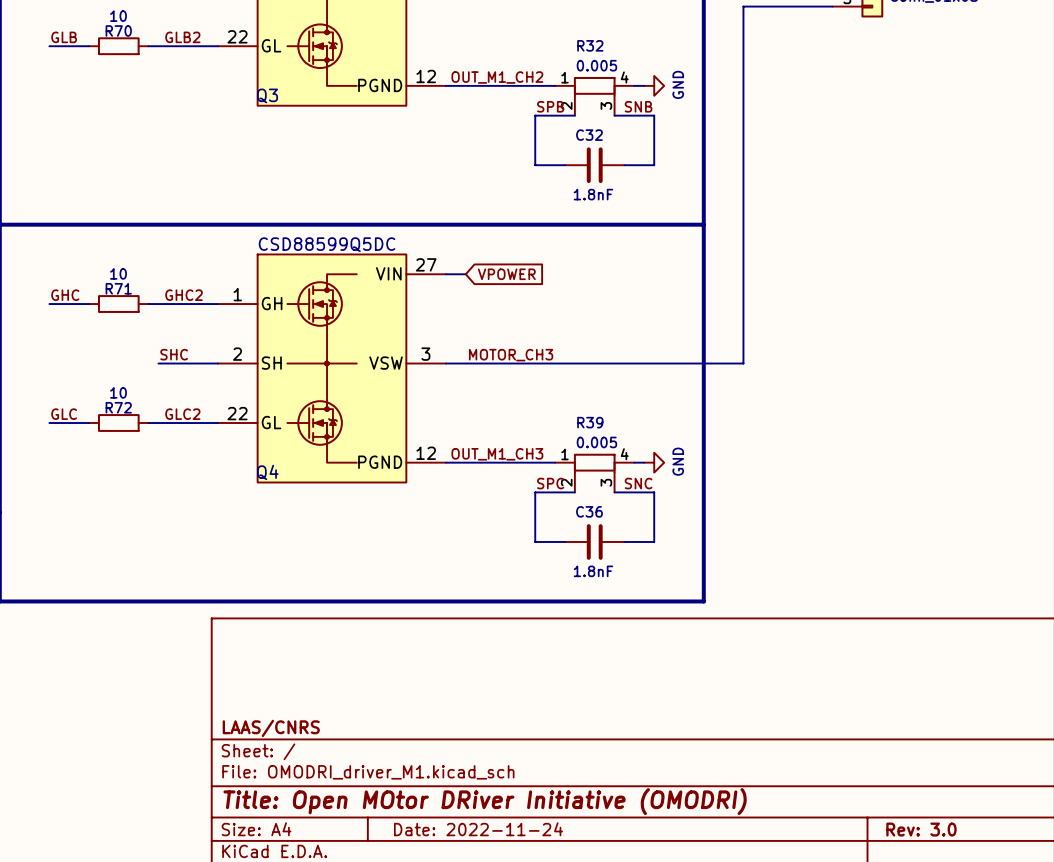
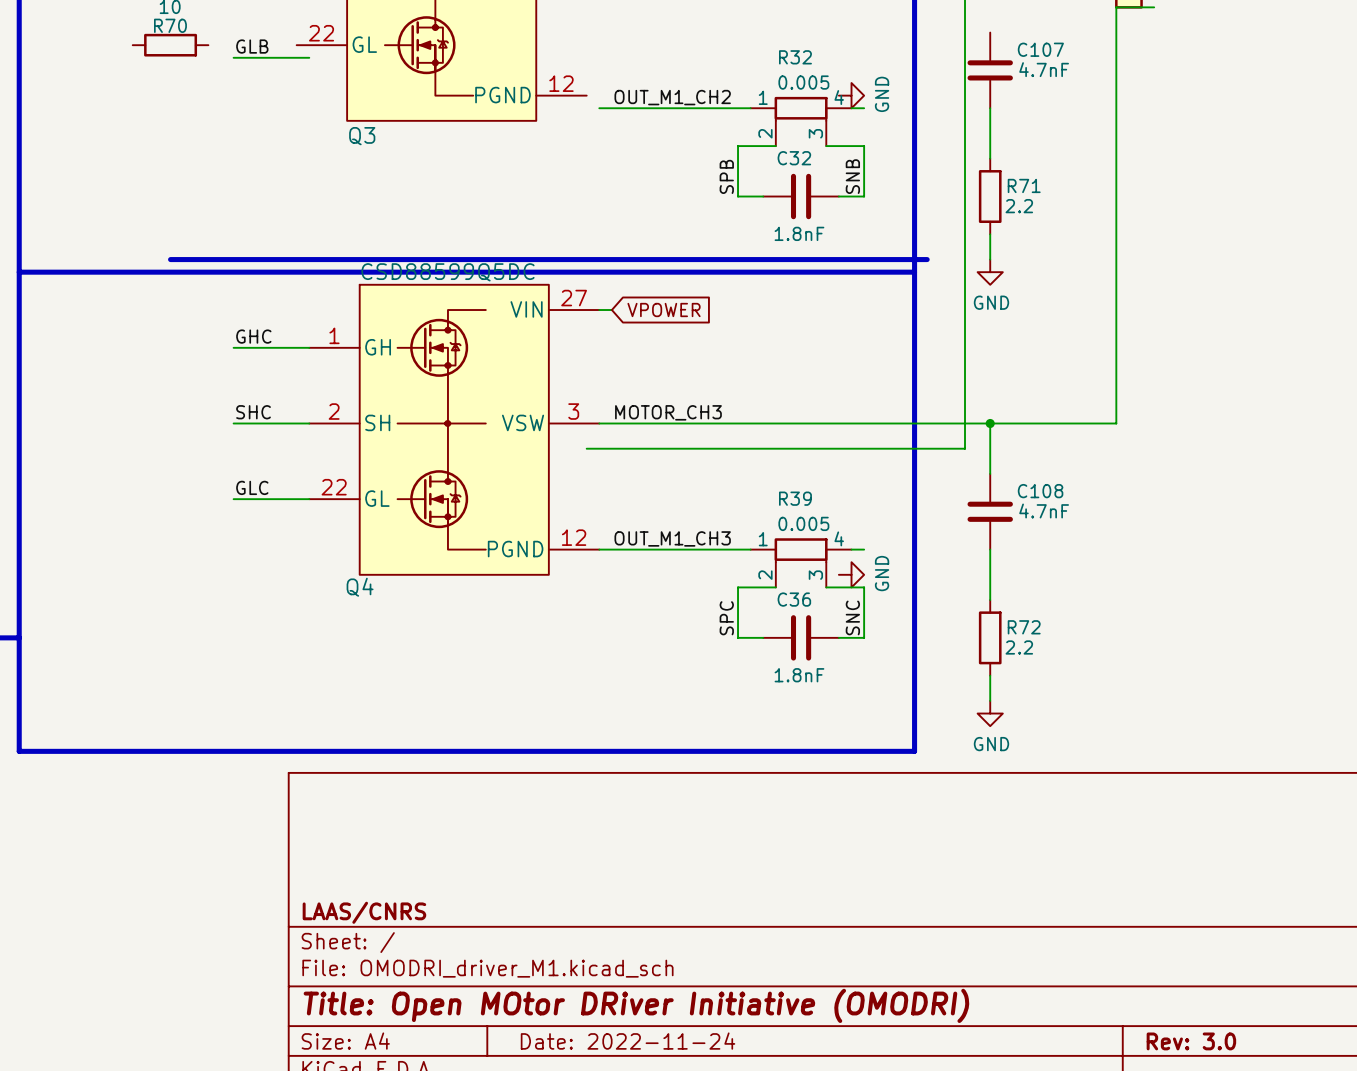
wire: none -> (1154, 7) (1116, 7) (1116, 423) (599, 423)
label: GLB (64, 37) -> none
label: GLB2 (182, 37) -> GLB (252, 46)
wire: (49, 46) (89, 46) -> none
wire: (148, 46) (217, 46) -> none
wire: none -> (233, 57) (309, 57)
C107: none -> 4.7nF (990, 70)
label position: OUT_M1_CH2 (497, 77) -> OUT_M1_CH2 (672, 97)
wire: (446, 85) (555, 85) -> none
wire: (634, 85) (644, 85) -> (851, 108) (864, 108)
Q3 name position: Q3 (267, 95) -> Q3 (362, 136)
wire: none -> (599, 108) (750, 108)
wire: none -> (990, 108) (990, 158)
R32 position: (594, 96) -> (801, 121)
label rotation: 0° (550, 106) -> 90° counterclockwise (726, 176)
label position: SPB (550, 106) -> SPB (726, 176)
label rotation: 0° (638, 106) -> 90° counterclockwise (852, 176)
label position: SNB (638, 106) -> SNB (852, 176)
wire: (574, 115) (535, 115) (535, 165) (564, 165) -> none
wire: (614, 115) (654, 115) (654, 165) -> (826, 146) (864, 146) (864, 196) (851, 196)
wire: none -> (775, 146) (738, 146) (738, 196) (763, 196)
C32 position: (594, 165) -> (801, 196)
wire: none -> (990, 234) (990, 259)
line: none -> (170, 259) (927, 259)
power symbol: none -> GND (990, 272)
wire: none -> (599, 310) (611, 310)
R71 value: 10 (118, 273) -> 2.2 (1019, 206)
wire: (446, 274) (465, 274) -> none
global label position: VPOWER (506, 274) -> VPOWER (664, 310)
wire: none -> (233, 347) (309, 347)
label position: GHC (65, 295) -> GHC (253, 336)
label: GHC2 (184, 295) -> none
wire: (49, 304) (89, 304) -> none
R71 rotation: 0° (118, 304) -> 90° clockwise (990, 196)
R71 position: (118, 304) -> (990, 196)
wire: (148, 304) (217, 304) -> none
wire: none -> (990, 423) (990, 473)
junction: none -> (990, 423)
label position: SHC (174, 354) -> SHC (253, 412)
label position: MOTOR_CH3 (511, 355) -> MOTOR_CH3 (668, 412)
wire: (158, 363) (217, 363) -> (233, 423) (309, 423)
Q4 position: (331, 368) -> (454, 429)
R72 value: 10 (118, 392) -> 2.2 (1019, 647)
wire: none -> (233, 499) (309, 499)
C108: none -> 4.7nF (990, 511)
label position: GLC (64, 414) -> GLC (252, 487)
label: GLC2 (182, 414) -> none
wire: (49, 423) (89, 423) -> none
R72 rotation: 0° (118, 423) -> 90° clockwise (990, 637)
R72 position: (118, 423) -> (990, 637)
wire: (148, 423) (217, 423) -> none
wire: none -> (599, 549) (750, 549)
wire: none -> (990, 549) (990, 600)
label position: OUT_M1_CH3 (497, 454) -> OUT_M1_CH3 (672, 538)
wire: (446, 462) (555, 462) -> none
wire: (634, 462) (644, 462) -> (851, 549) (864, 549)
wire: none -> (775, 587) (738, 587) (738, 637) (763, 637)
wire: none -> (826, 587) (864, 587) (864, 637) (838, 637)
R39 position: (594, 473) -> (801, 562)
label rotation: 0° (550, 483) -> 90° counterclockwise (726, 618)
label rotation: 0° (638, 483) -> 90° counterclockwise (852, 617)
wire: (574, 492) (535, 492) (535, 541) (564, 541) -> none
wire: (614, 492) (654, 492) (654, 541) (624, 541) -> none
C36 position: (594, 541) -> (801, 637)
wire: none -> (990, 675) (990, 700)
power symbol: none -> GND (990, 713)

